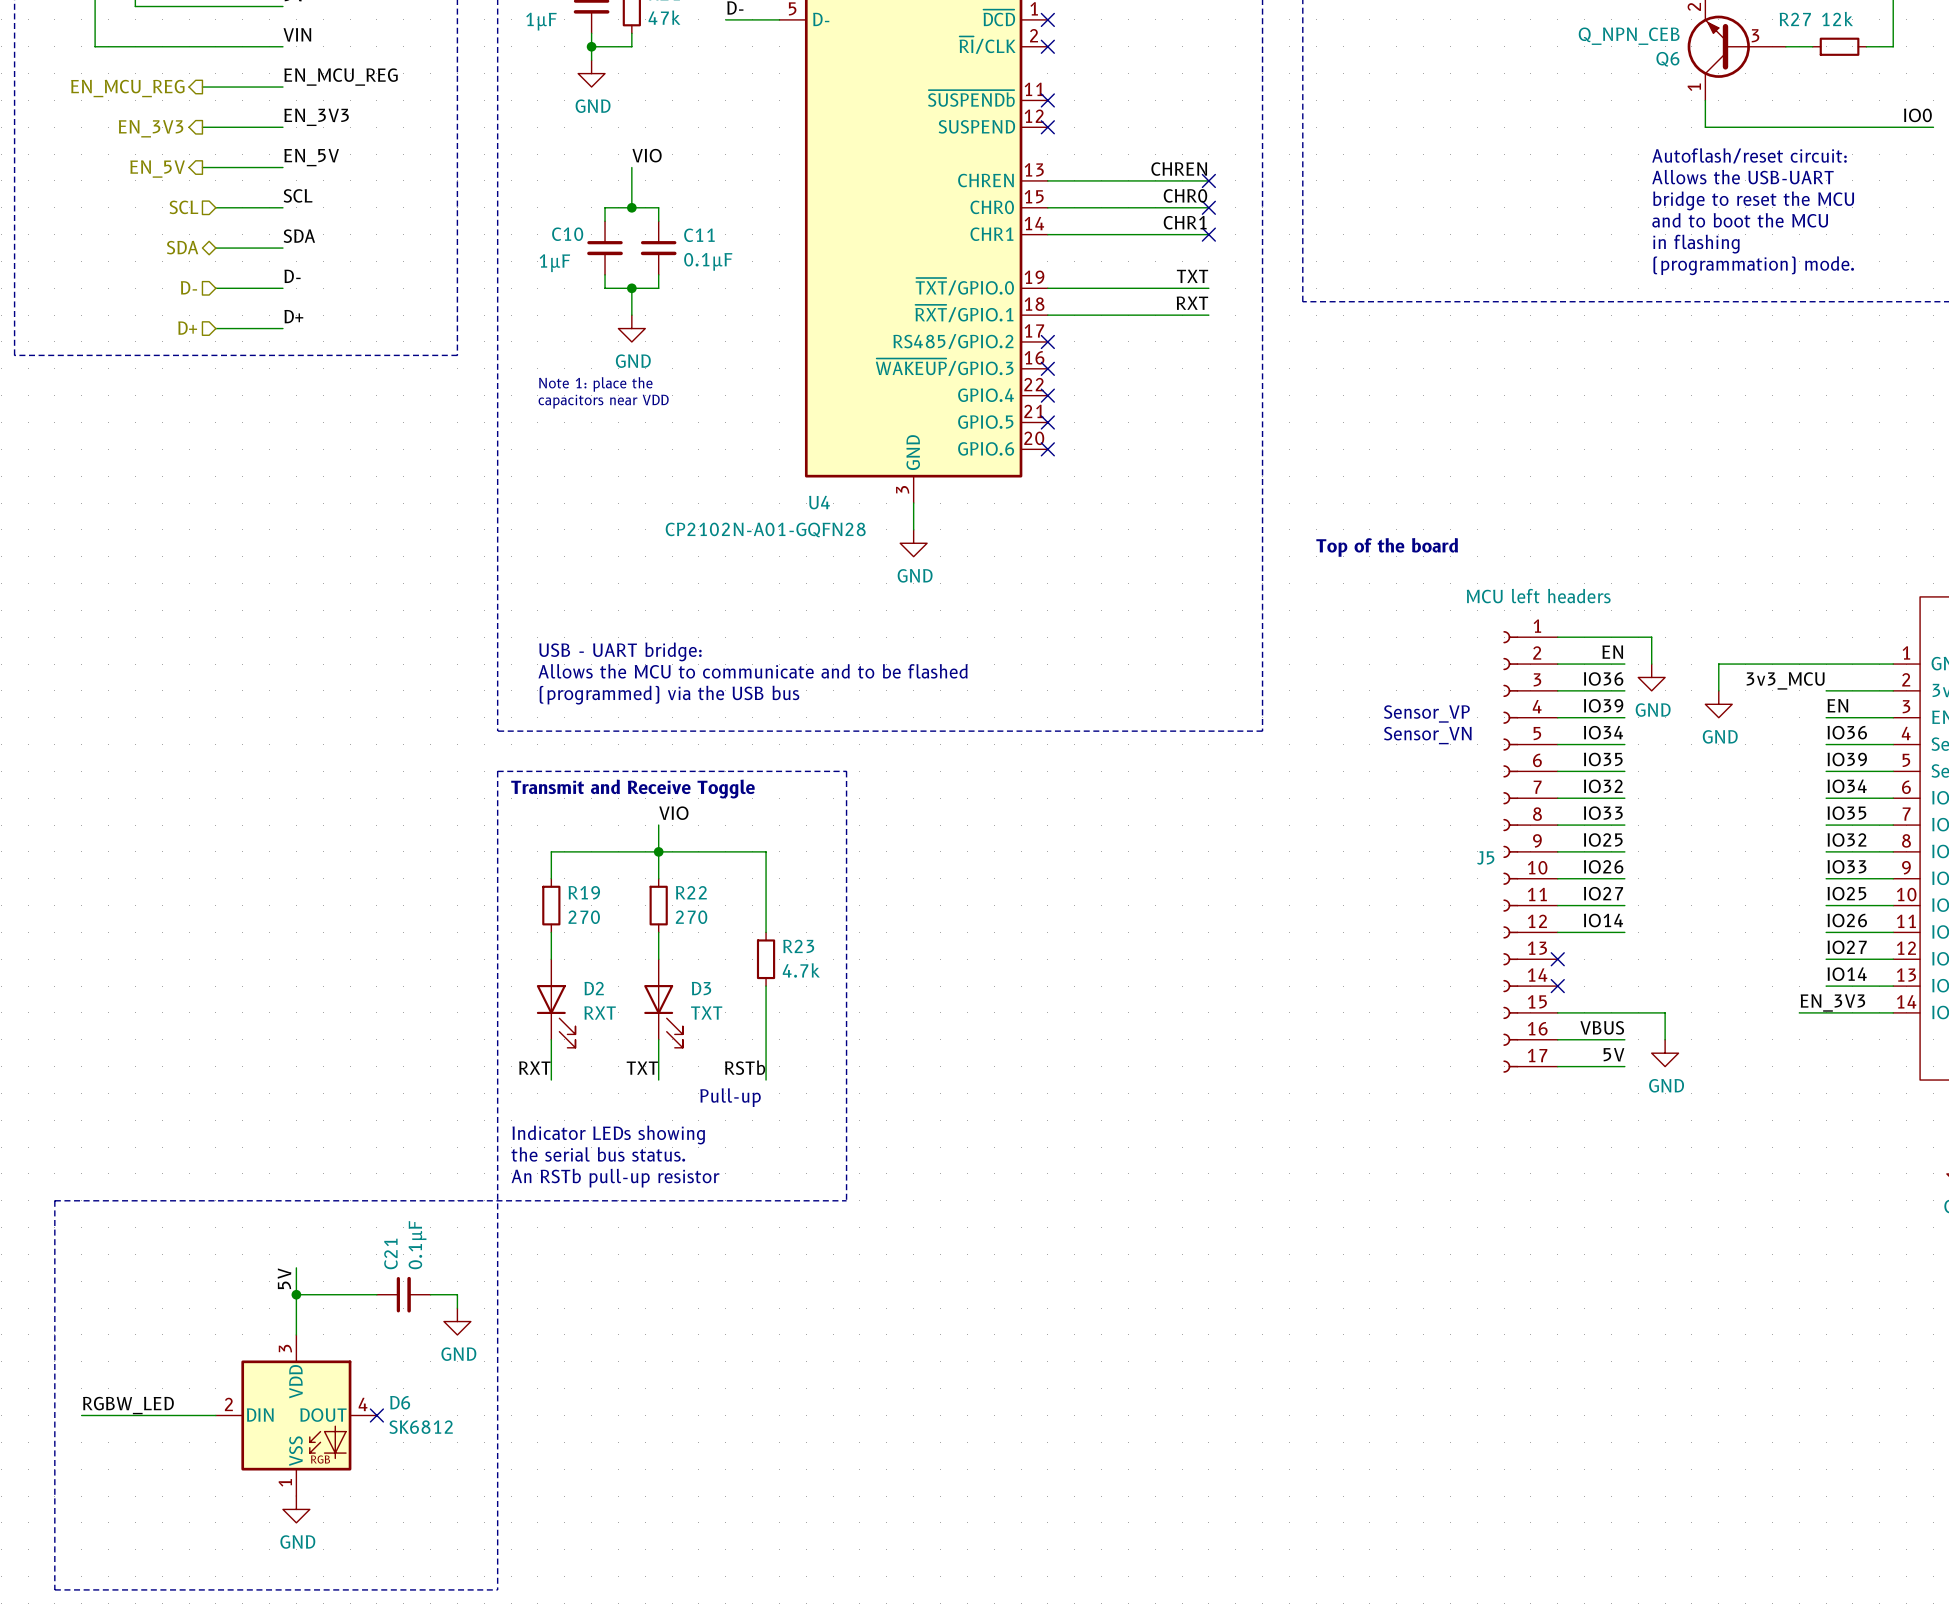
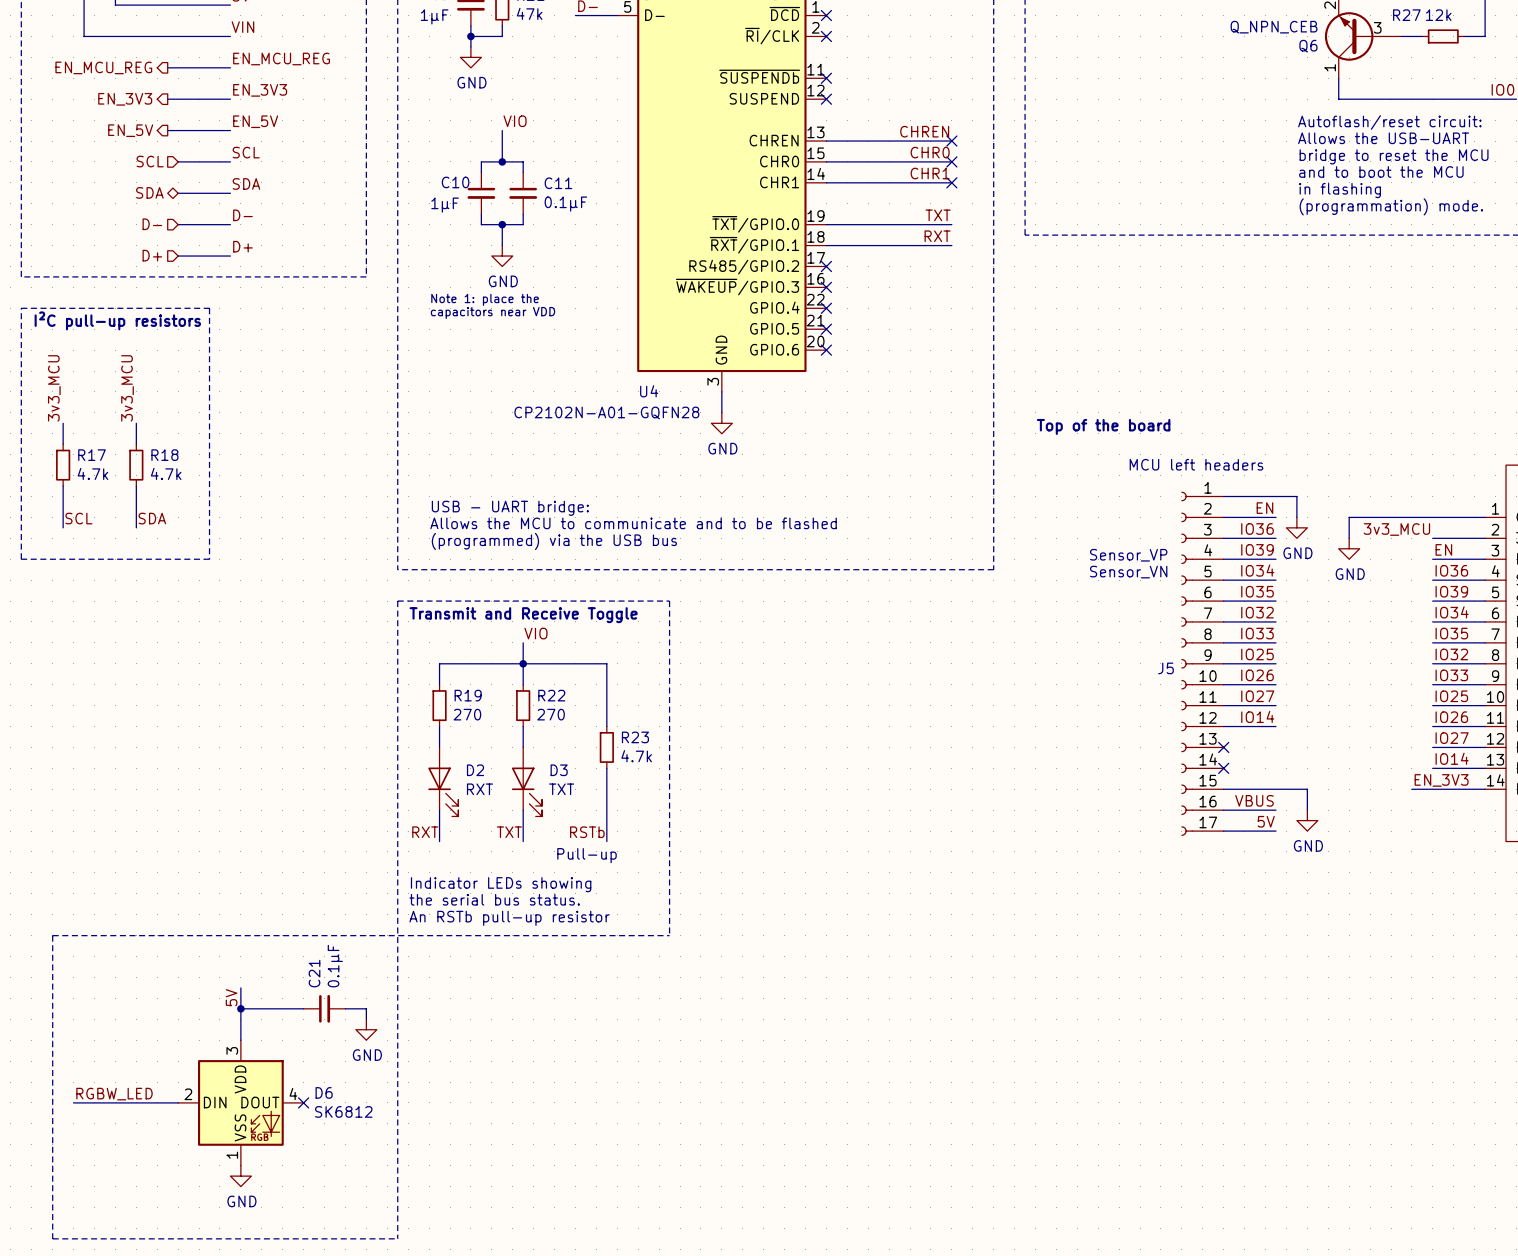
line: none -> (21, 308) (209, 308) (209, 559) (21, 559) (21, 308)
text: none -> I²C pull-up resistors (117, 320)
label: none -> 3v3_MCU (54, 388)
label: none -> 3v3_MCU (127, 388)
wire: none -> (63, 423) (63, 444)
wire: none -> (136, 423) (136, 444)
R17: none -> 4.7k (63, 465)
R18: none -> 4.7k (136, 465)
wire: none -> (63, 486) (63, 527)
wire: none -> (136, 486) (136, 527)
label: none -> SCL (78, 518)
label: none -> SDA (152, 518)

